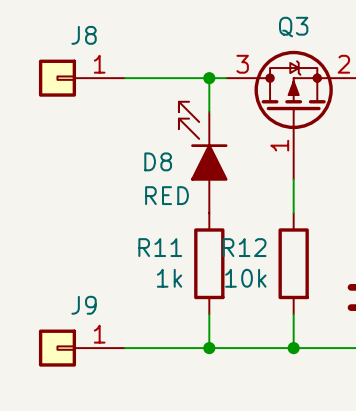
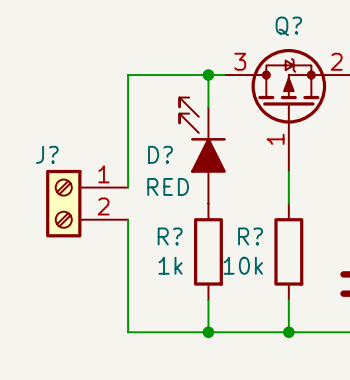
Q3 name: Q3 (293, 27) -> Q? (288, 26)
J8: (81, 78) -> none
wire: none -> (128, 75) (128, 187)
D8 name: D8 (158, 161) -> D? (160, 154)
J?: none -> (87, 203)
wire: none -> (128, 219) (128, 332)
R11 name: R11 (160, 247) -> R? (170, 236)
R12 name: R12 (244, 247) -> R? (250, 236)
J9: (81, 348) -> none

